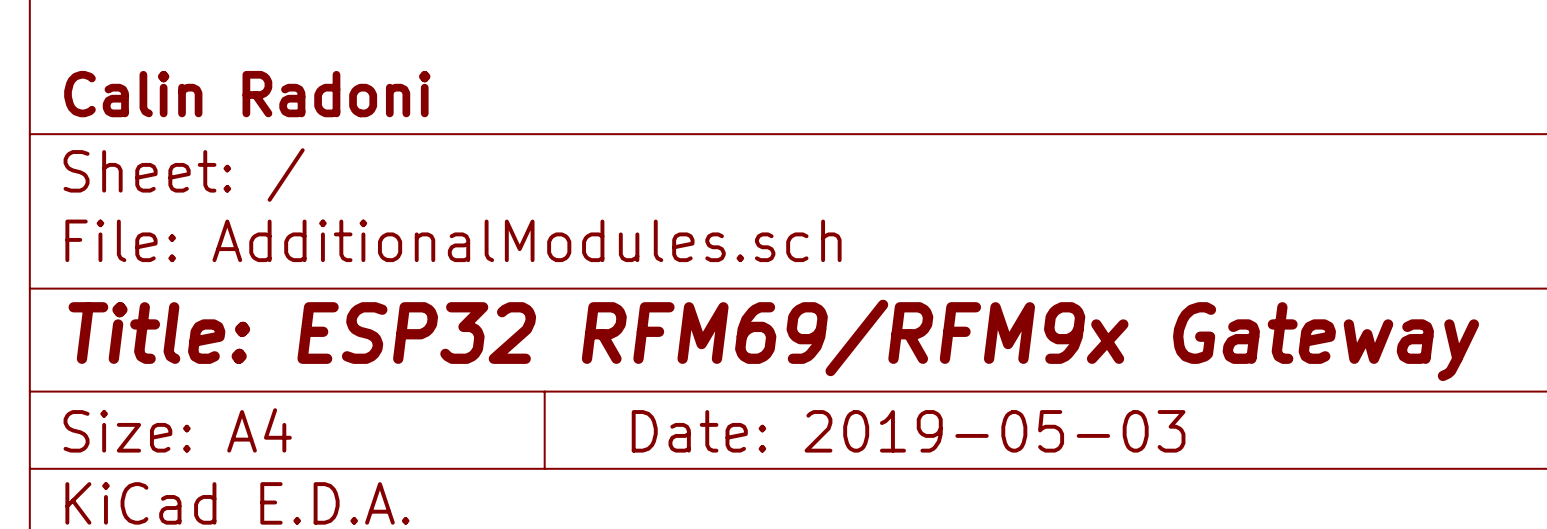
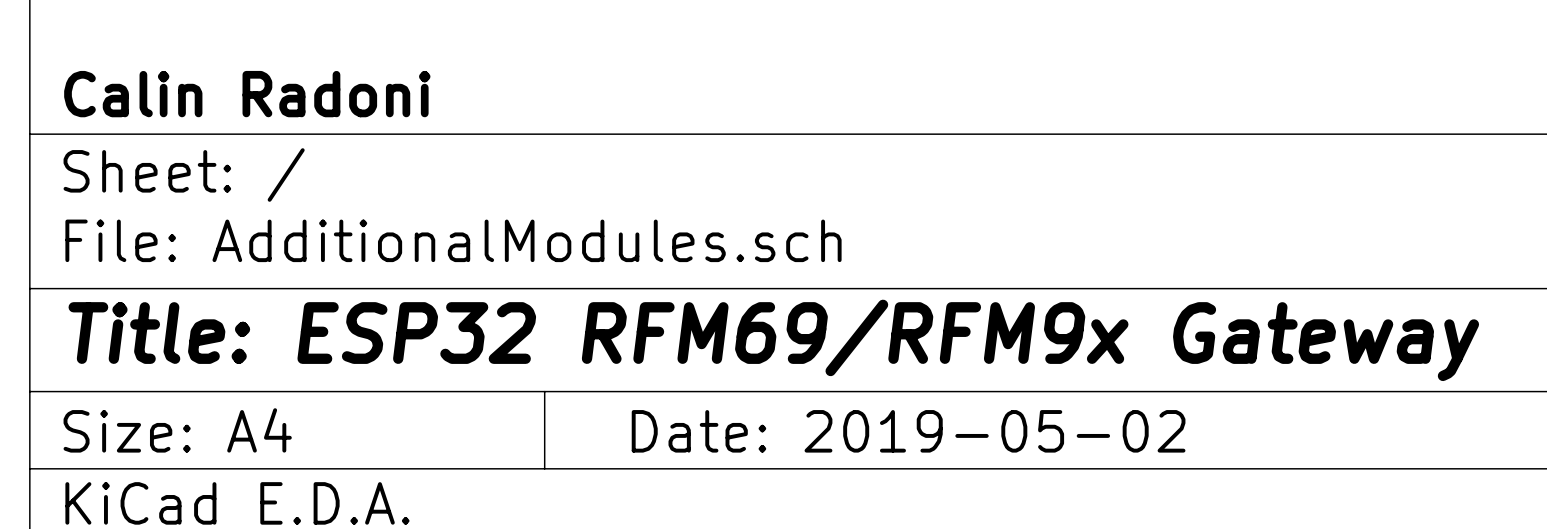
title block: Date: 2019-05-03 (908, 431) -> Date: 2019-05-02 (908, 431)

